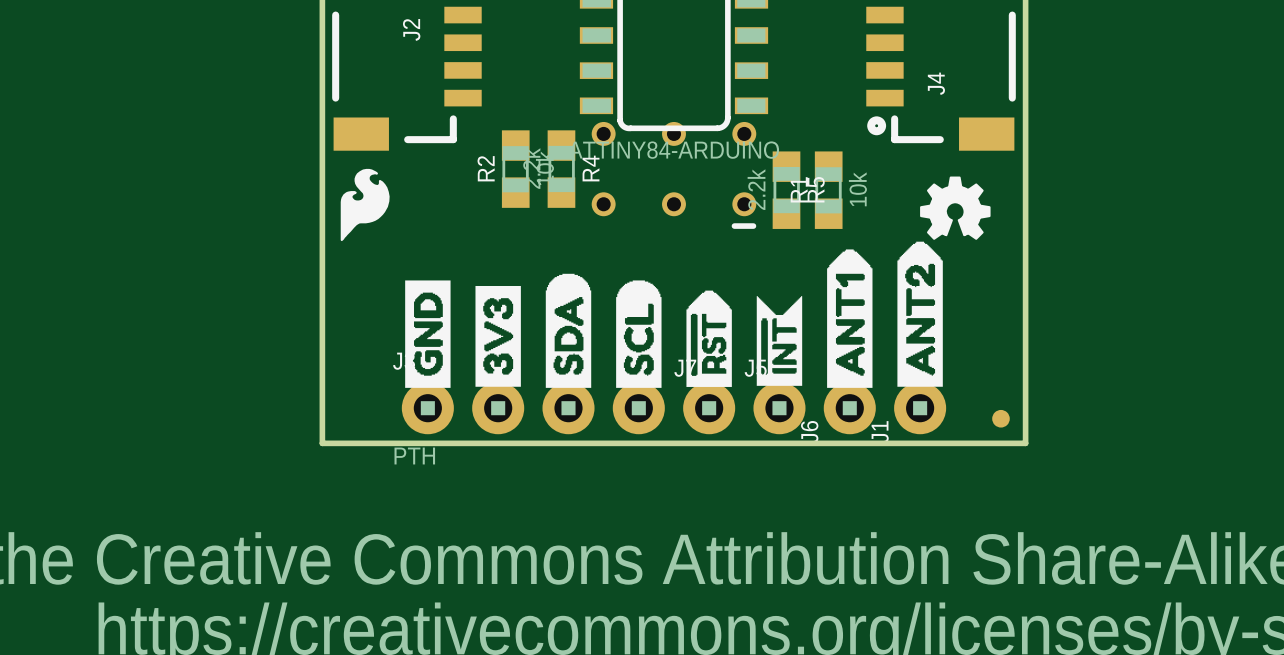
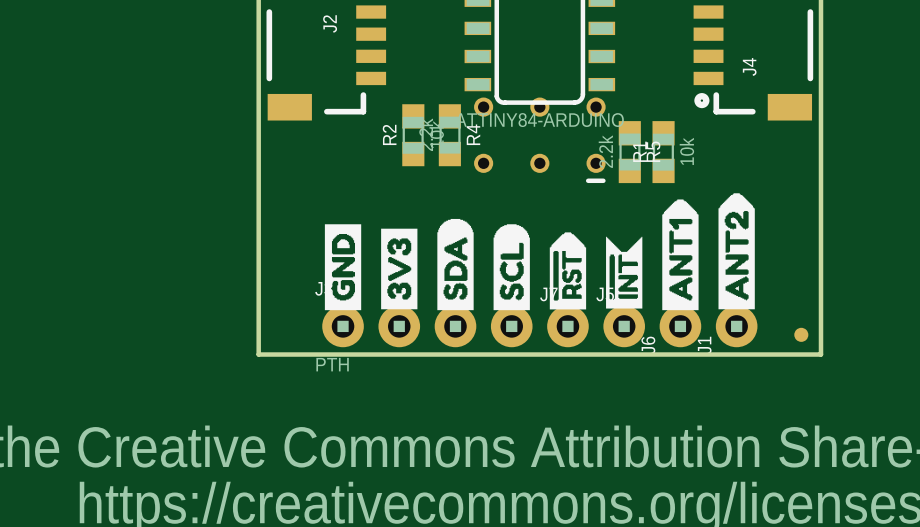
drawing: [340, 168, 390, 242] -> none
drawing: [920, 176, 991, 240] -> none

